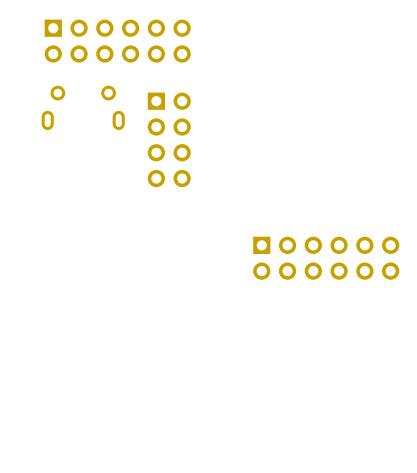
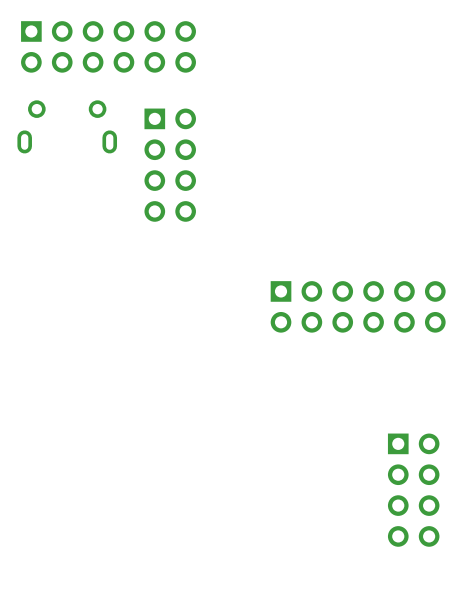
part: none -> (413, 490)

